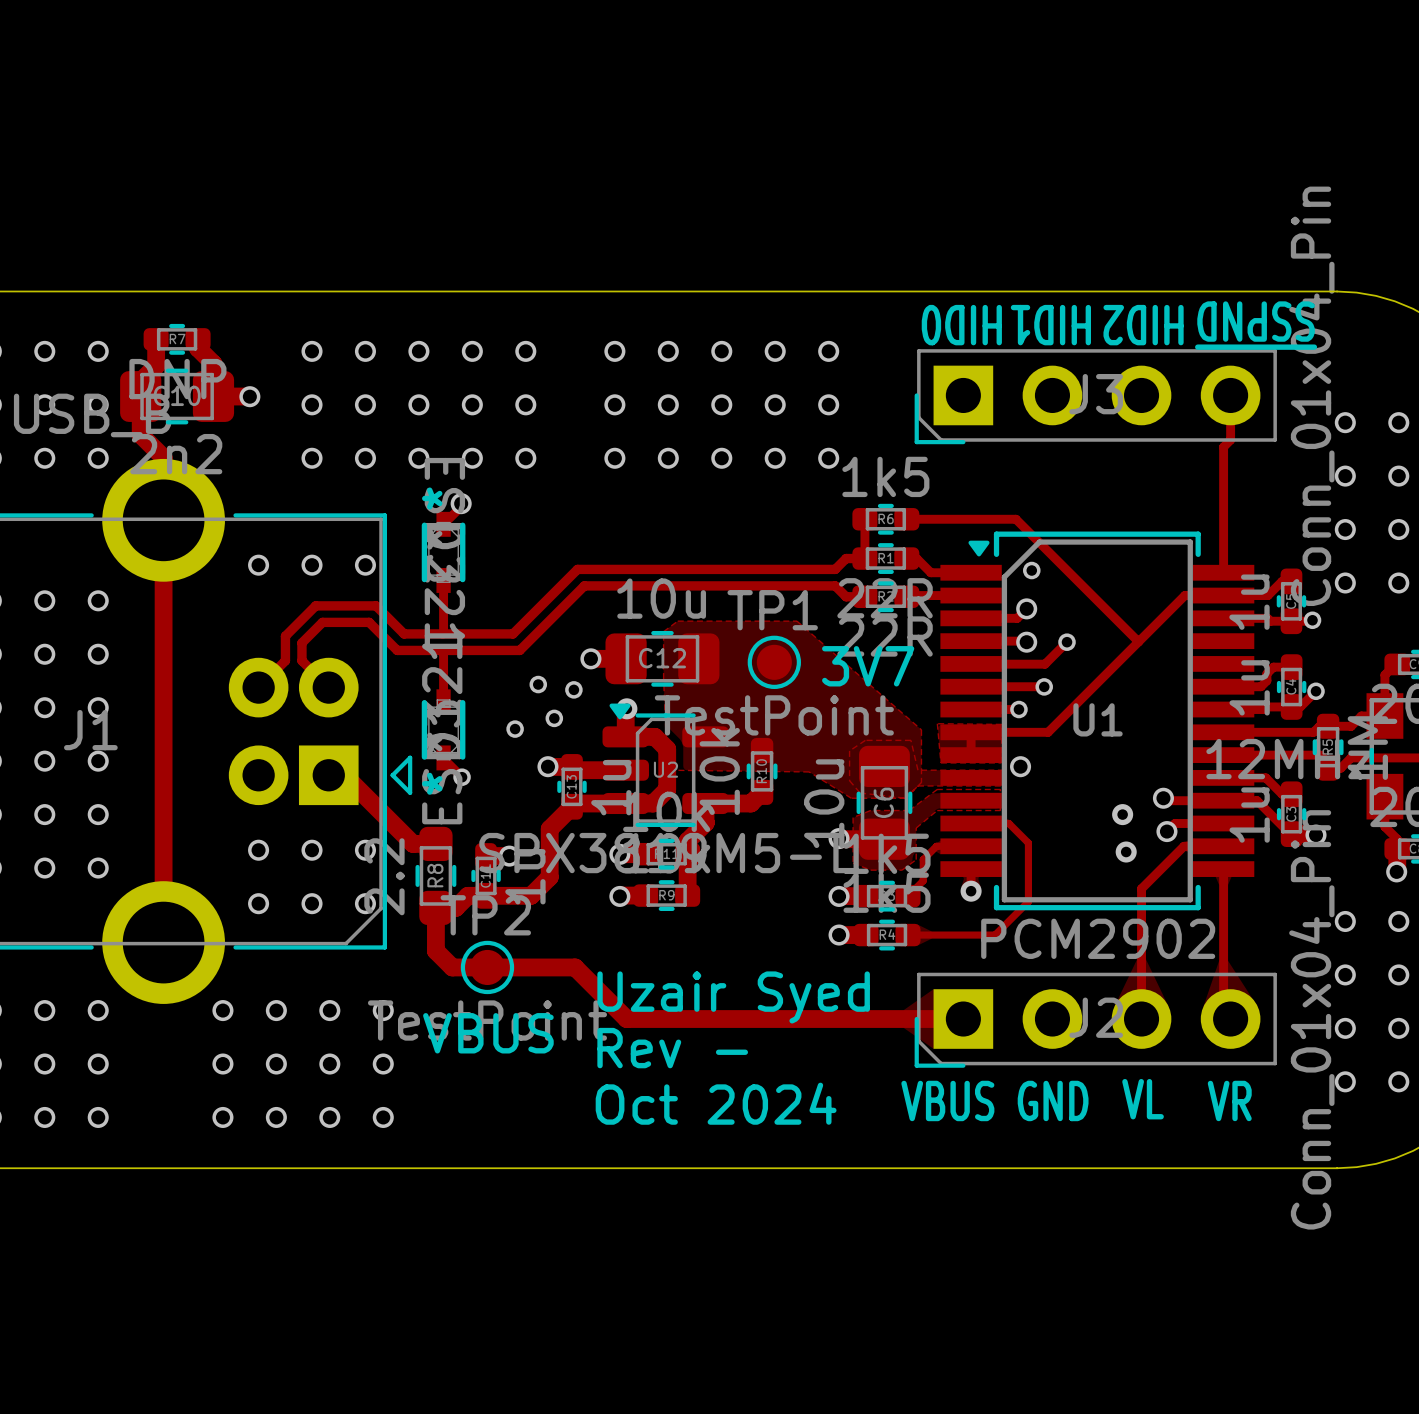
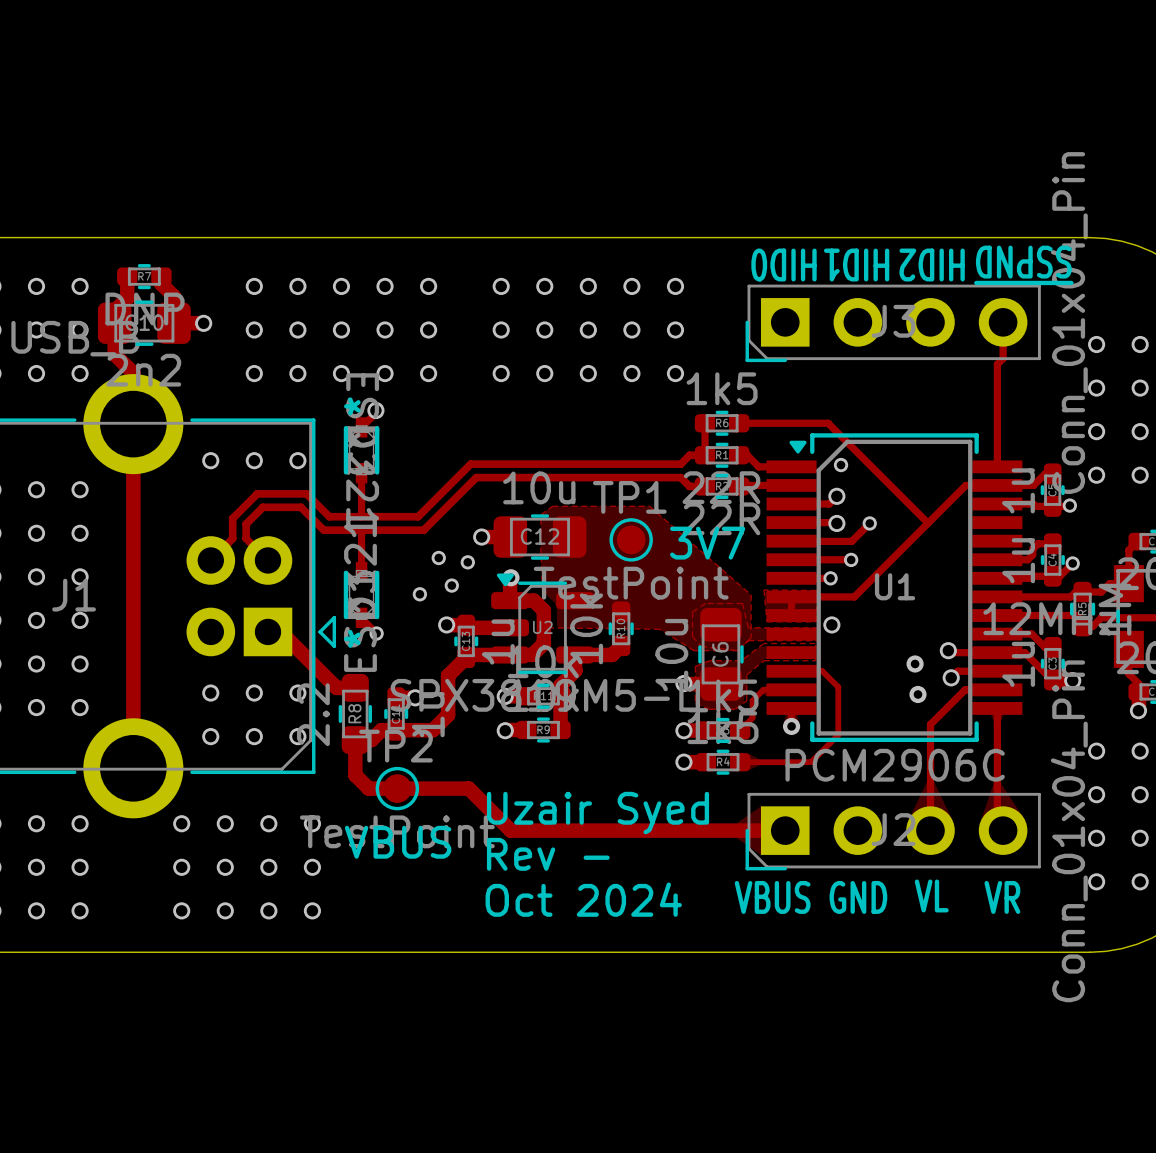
U1 value: PCM2902 (1098, 938) -> PCM2906C (895, 765)

